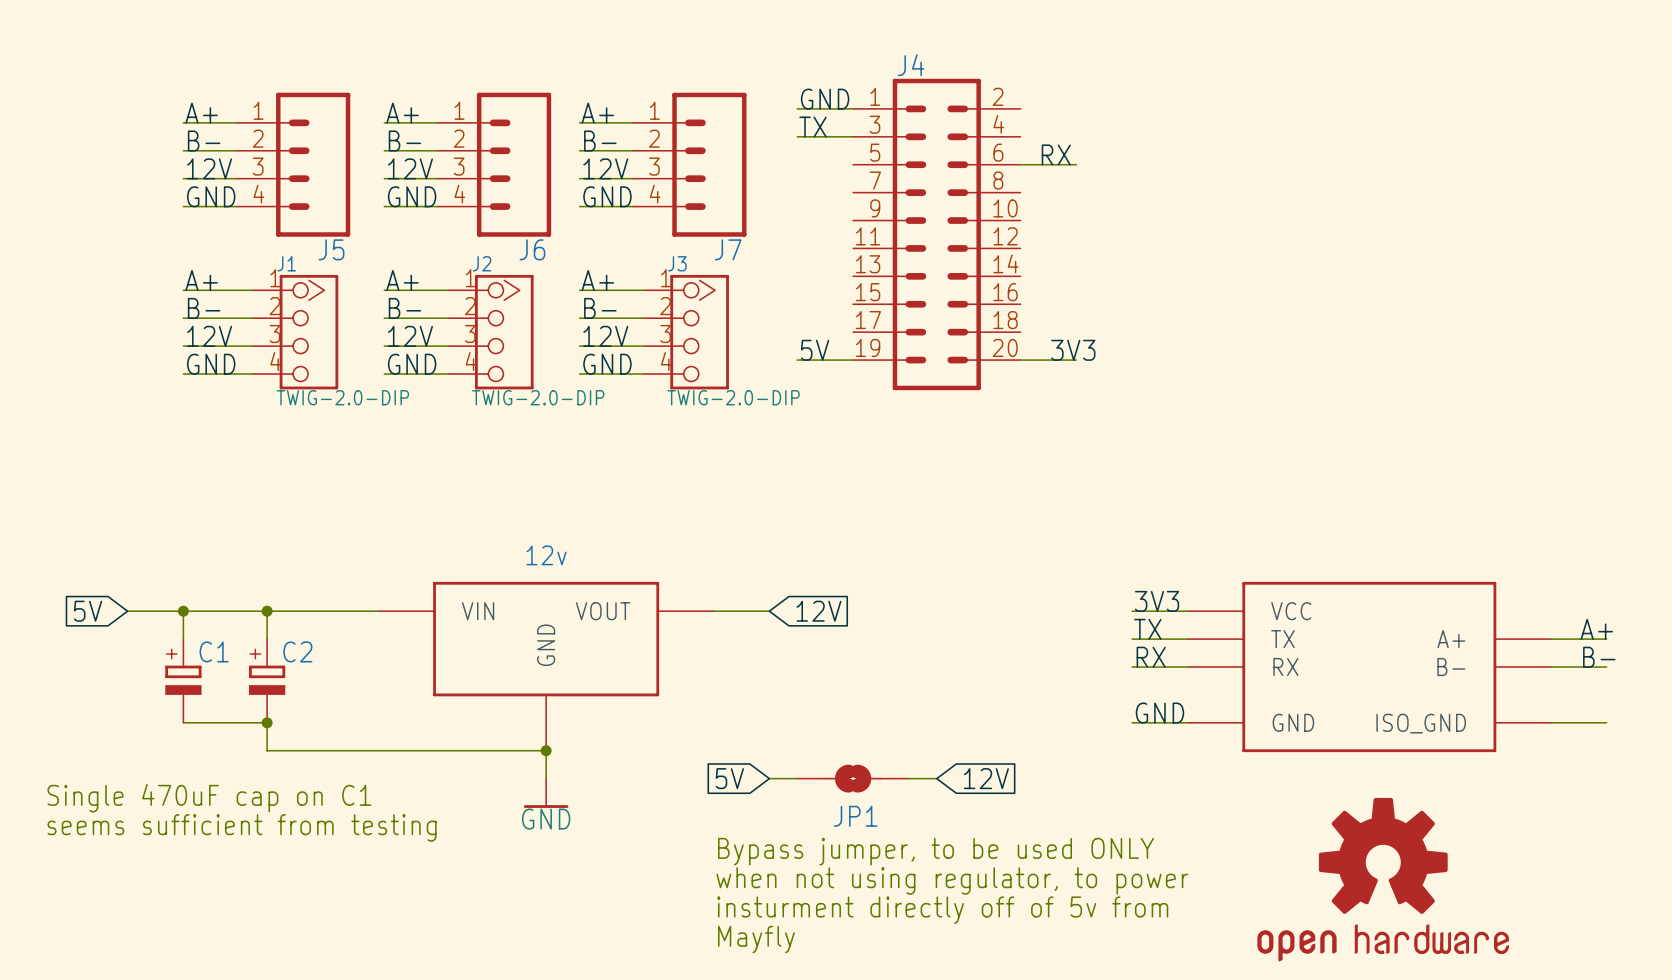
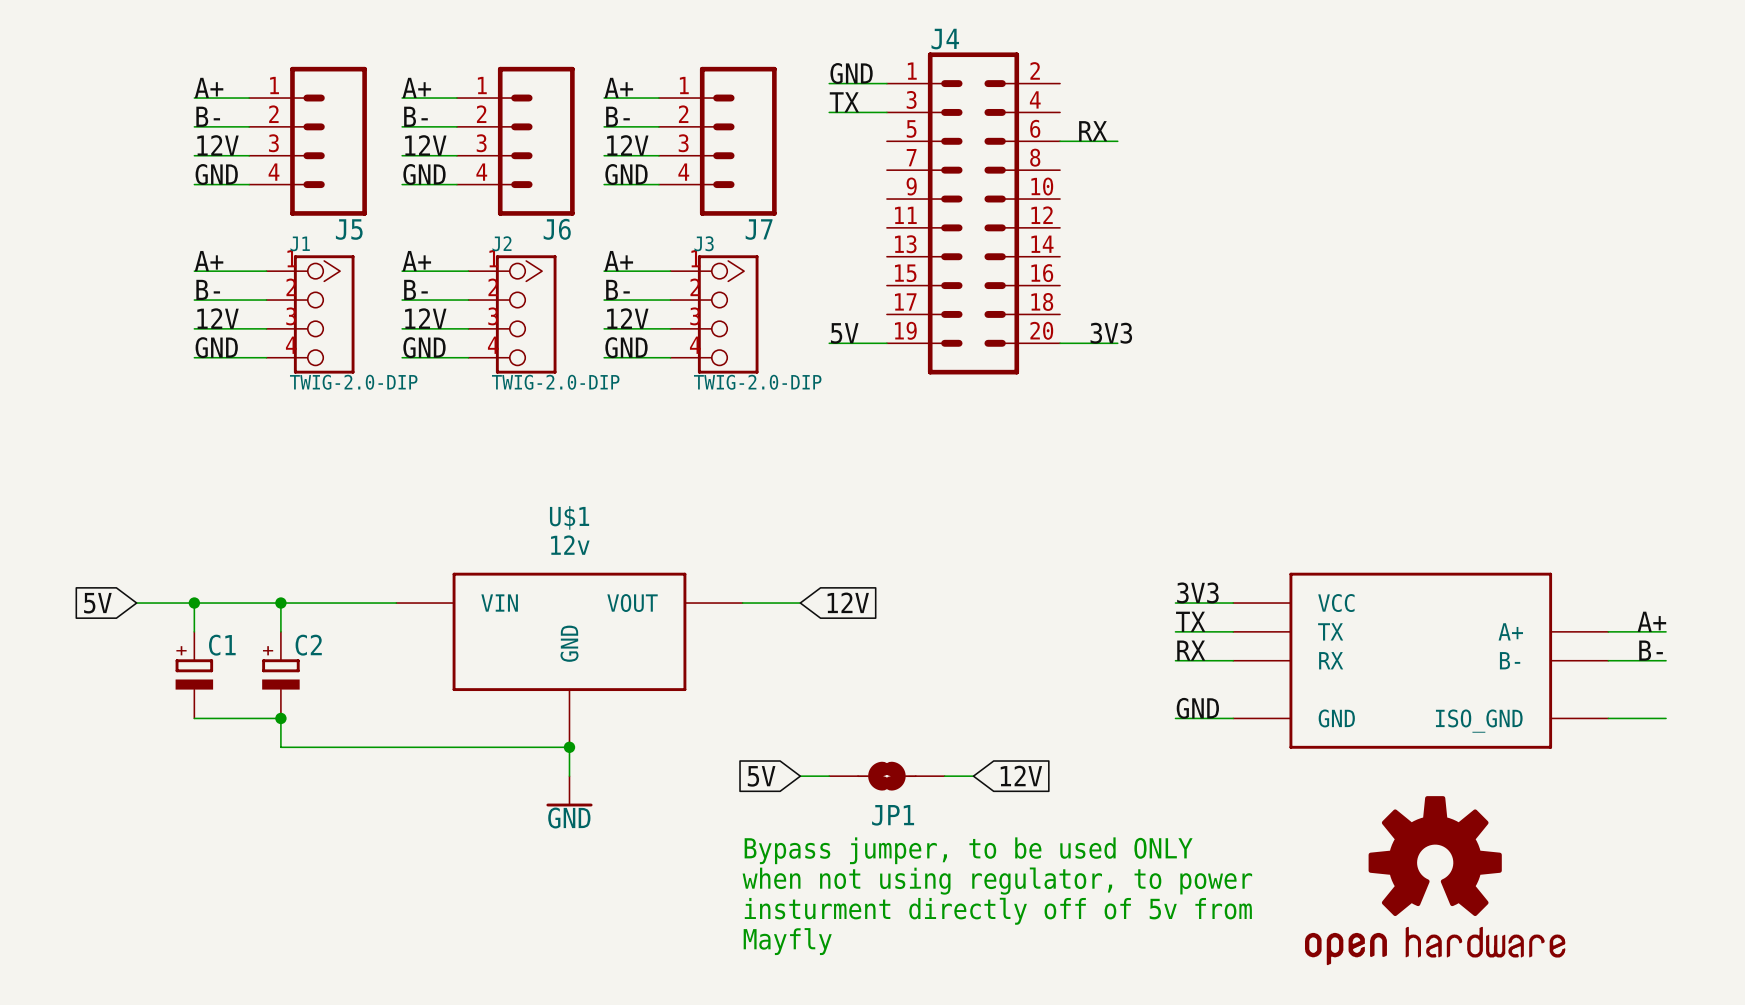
U$1 name: none -> U$1 (569, 517)
text: Single 470uF cap on C1 (209, 798) -> none
text: seems sufficient from testing (242, 827) -> none

